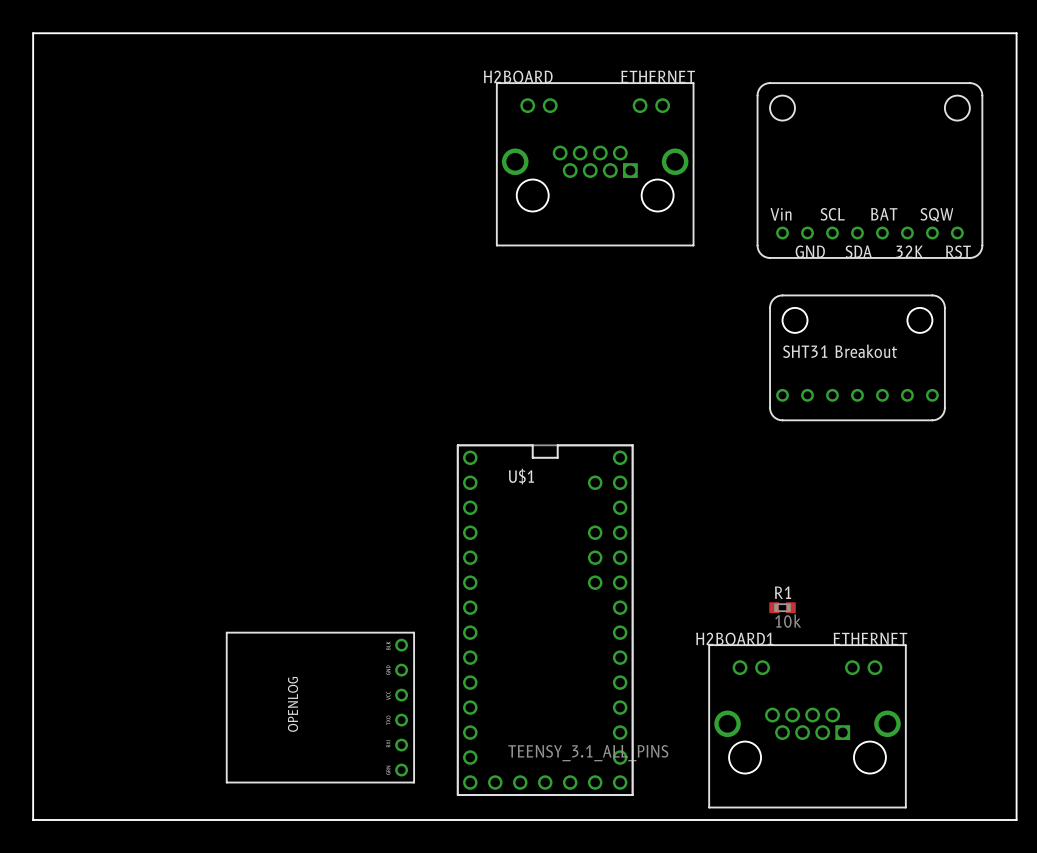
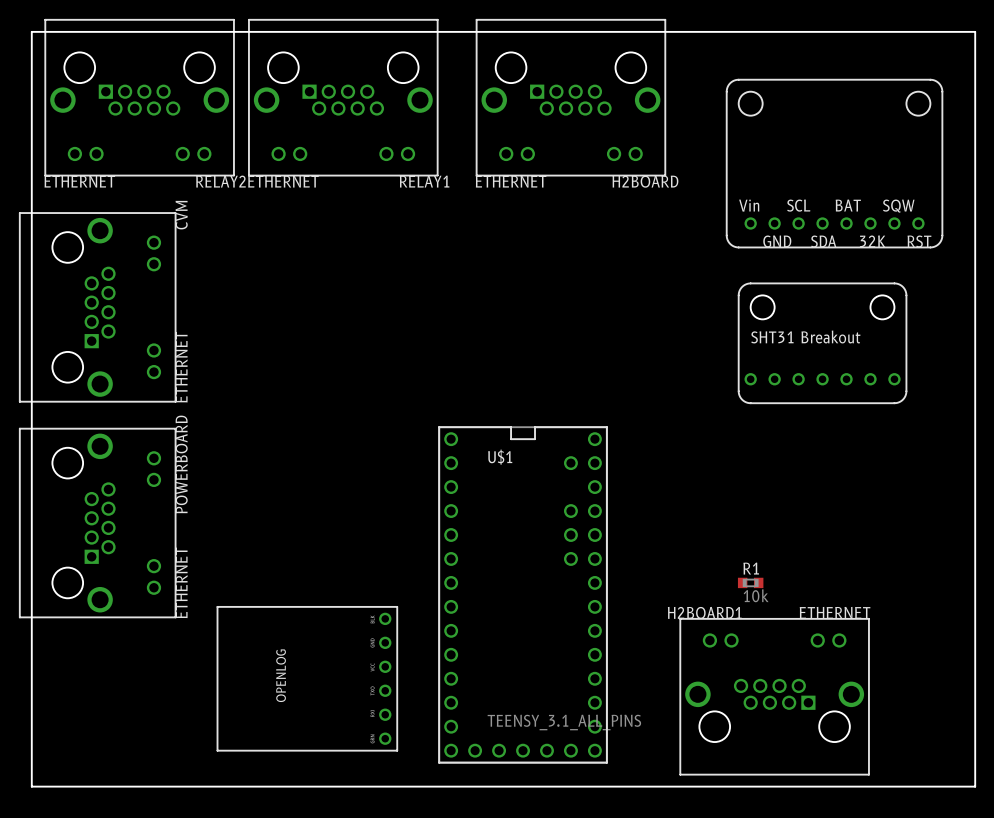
RELAY2: none -> ETHERNET (139, 97)
RELAY1: none -> ETHERNET (343, 97)
H2BOARD rotation: 0° (595, 164) -> 180° (570, 97)
CVM: none -> ETHERNET (97, 307)
POWERBOARD: none -> ETHERNET (97, 523)

